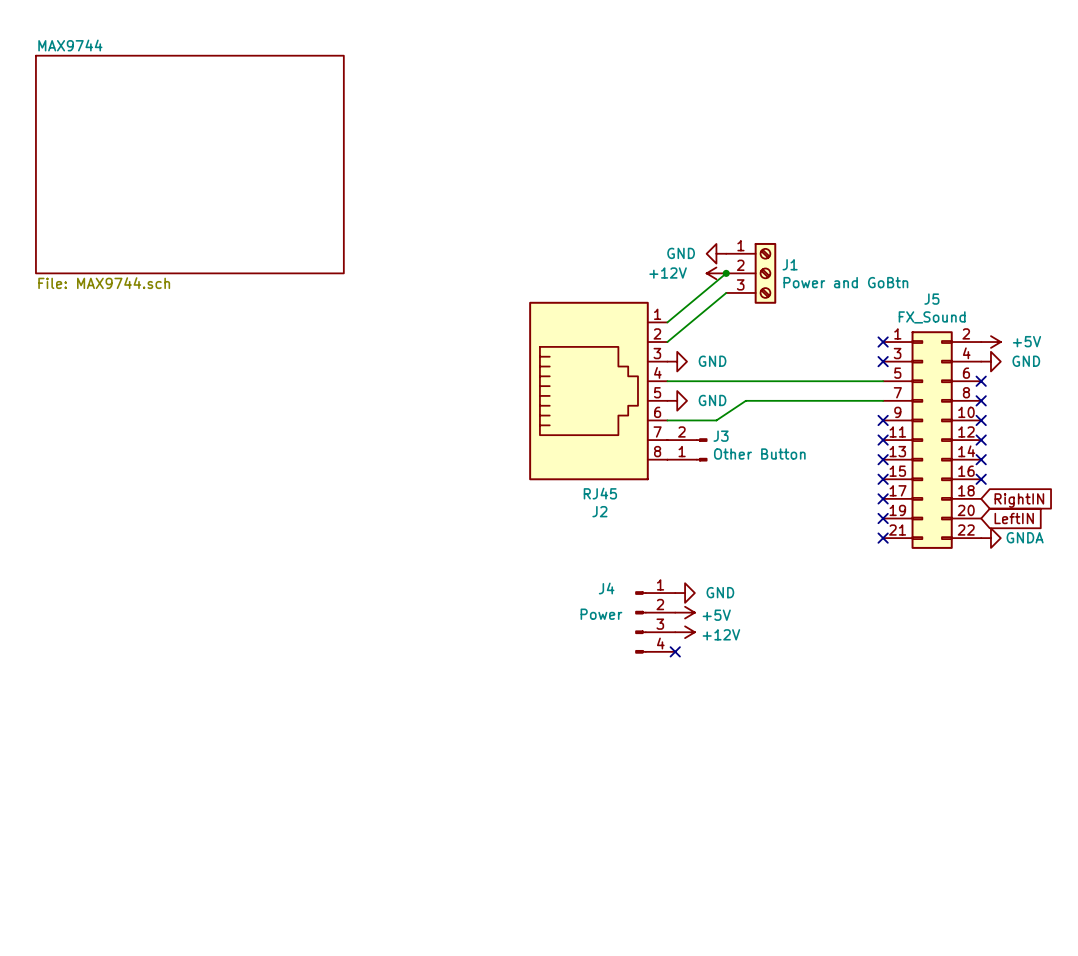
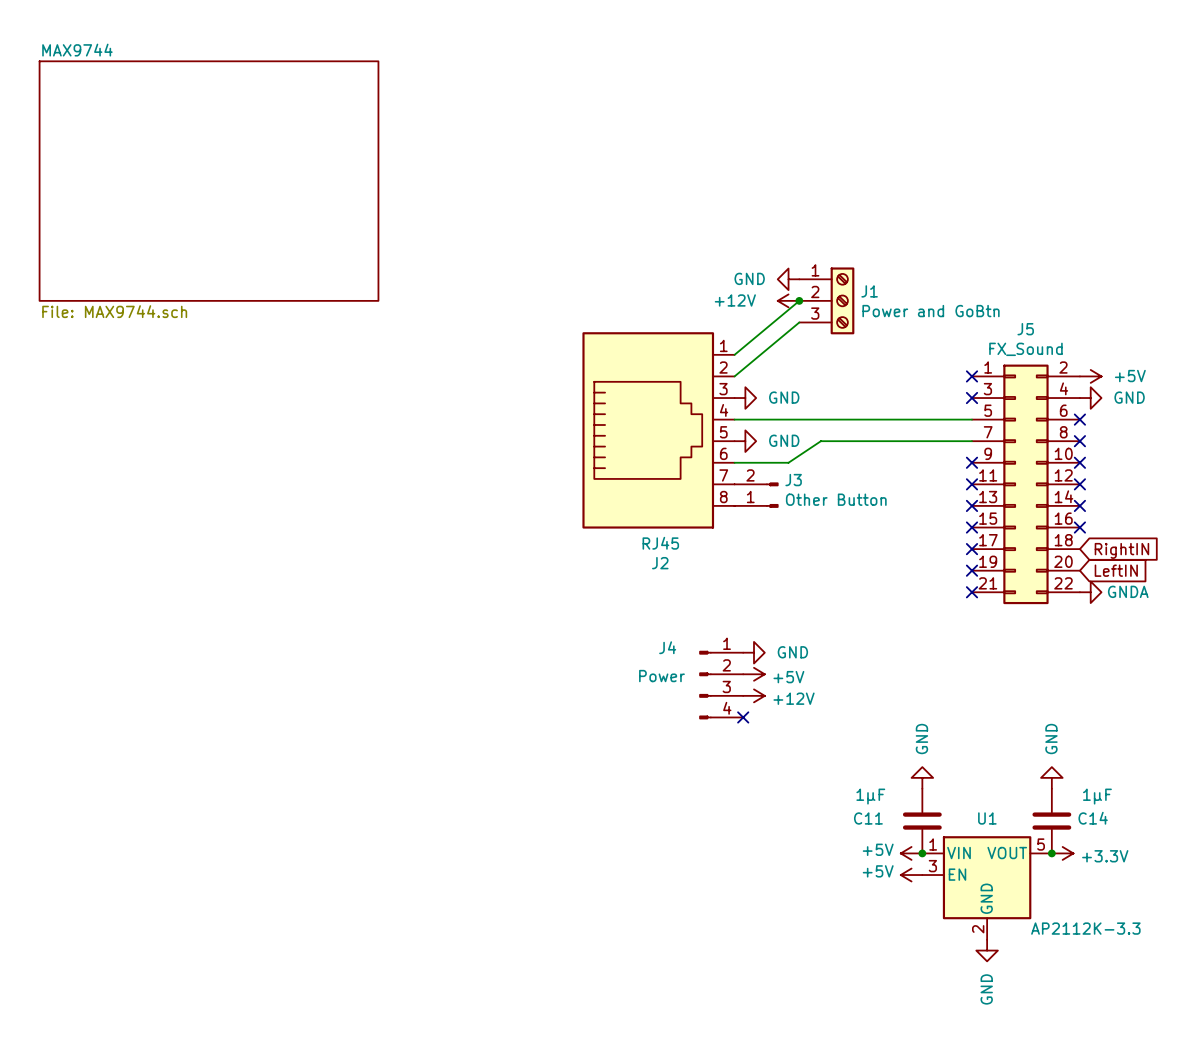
power symbol: none -> GND (922, 777)
power symbol: none -> GND (1051, 777)
C11: none -> 1µF (922, 821)
C14: none -> 1µF (1051, 821)
power symbol: none -> +5V (911, 853)
junction: none -> (922, 853)
junction: none -> (1051, 853)
power symbol: none -> +3.3V (1062, 853)
power symbol: none -> +5V (911, 875)
U1: none -> AP2112K-3.3 (987, 887)
power symbol: none -> GND (987, 950)

